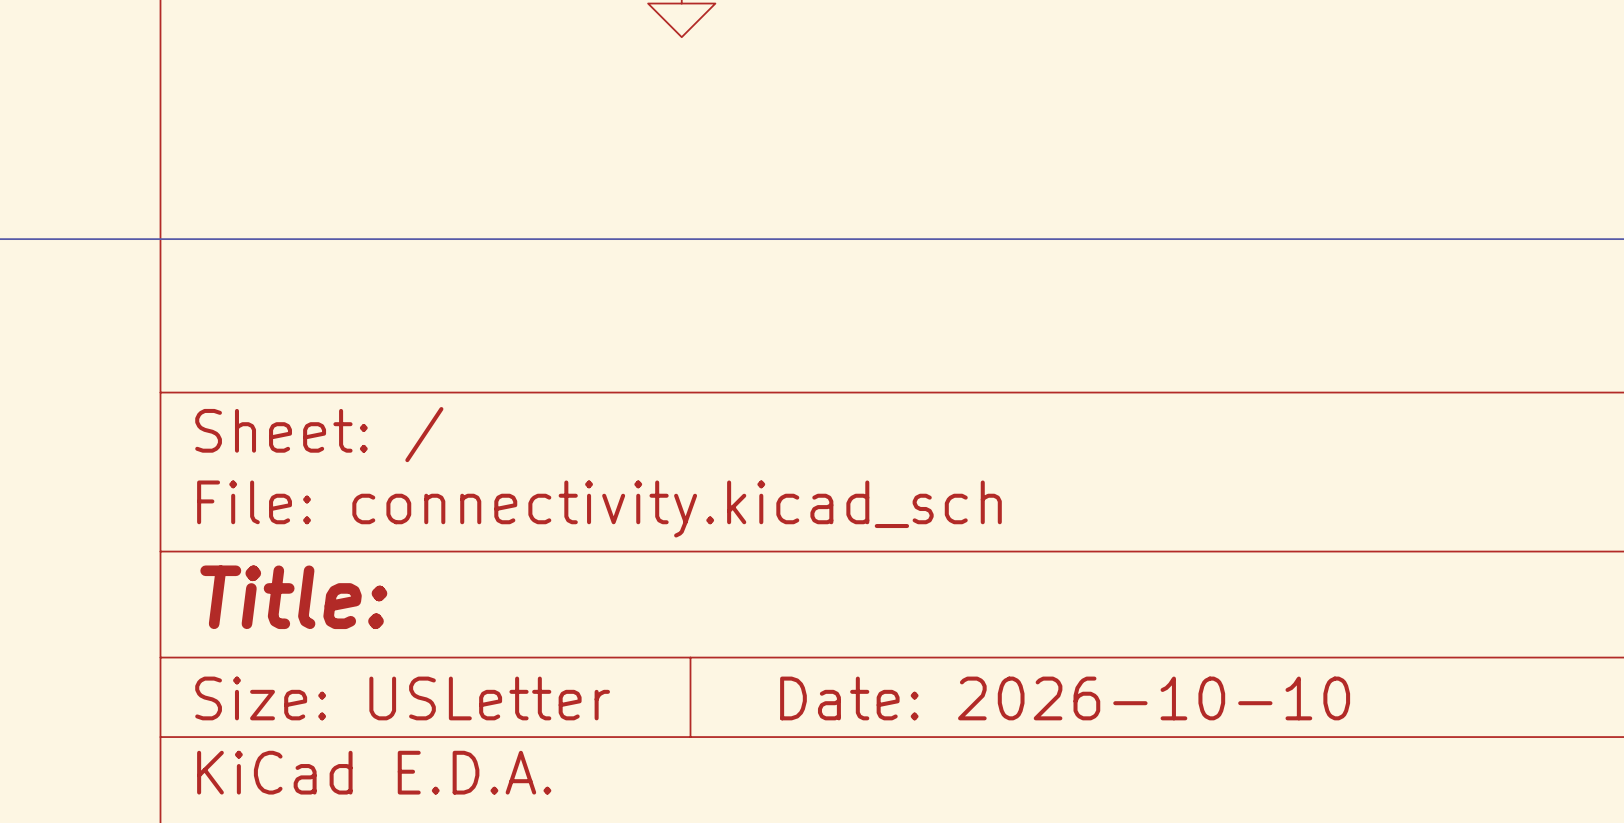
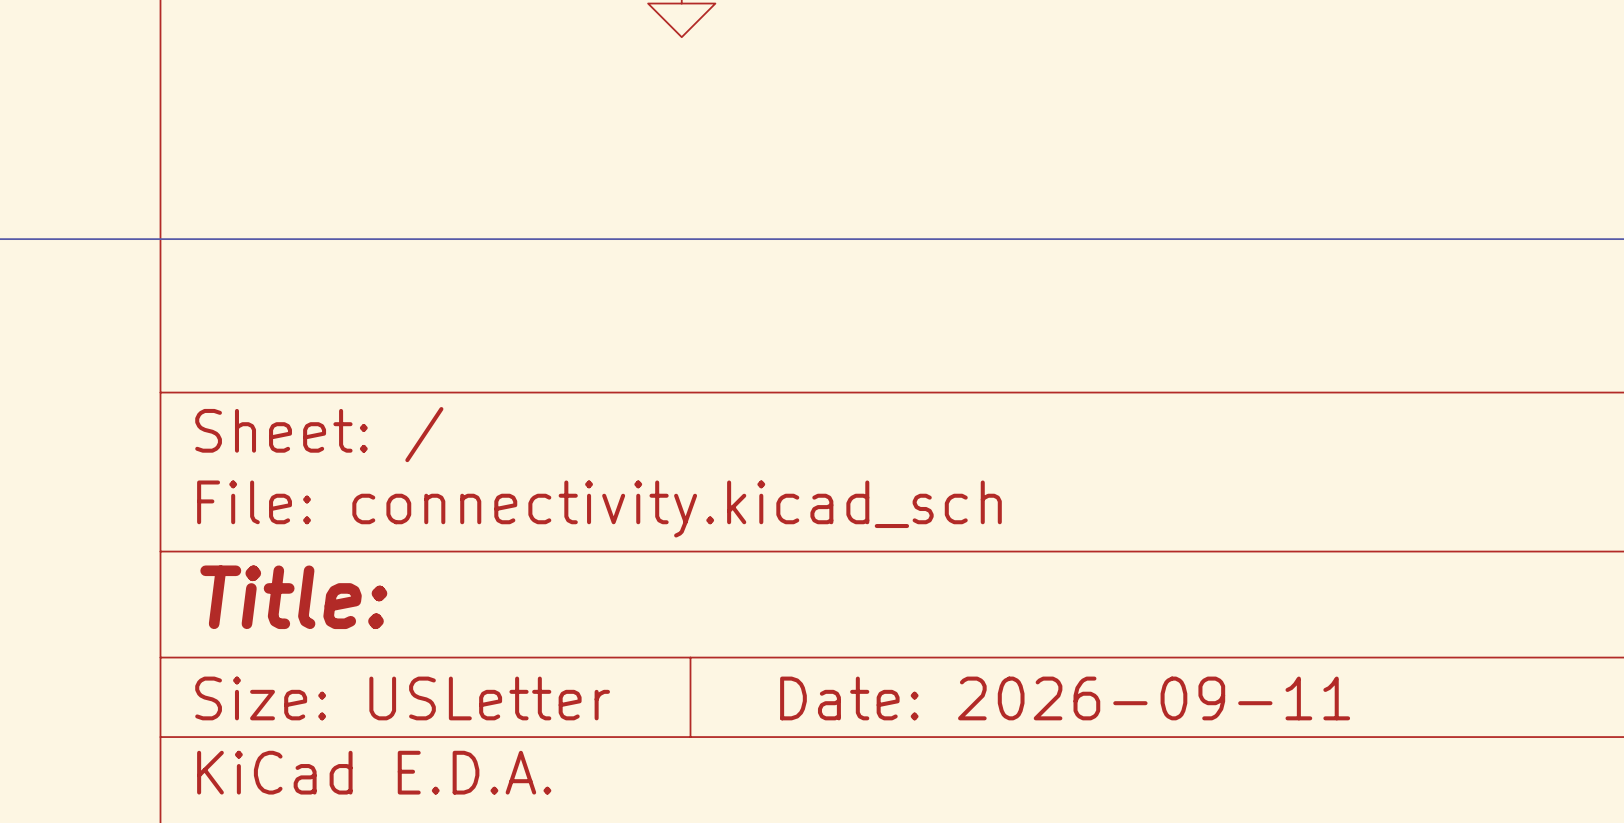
title block: Date: 2026-10-10 (1065, 698) -> Date: 2026-09-11 (1065, 698)

